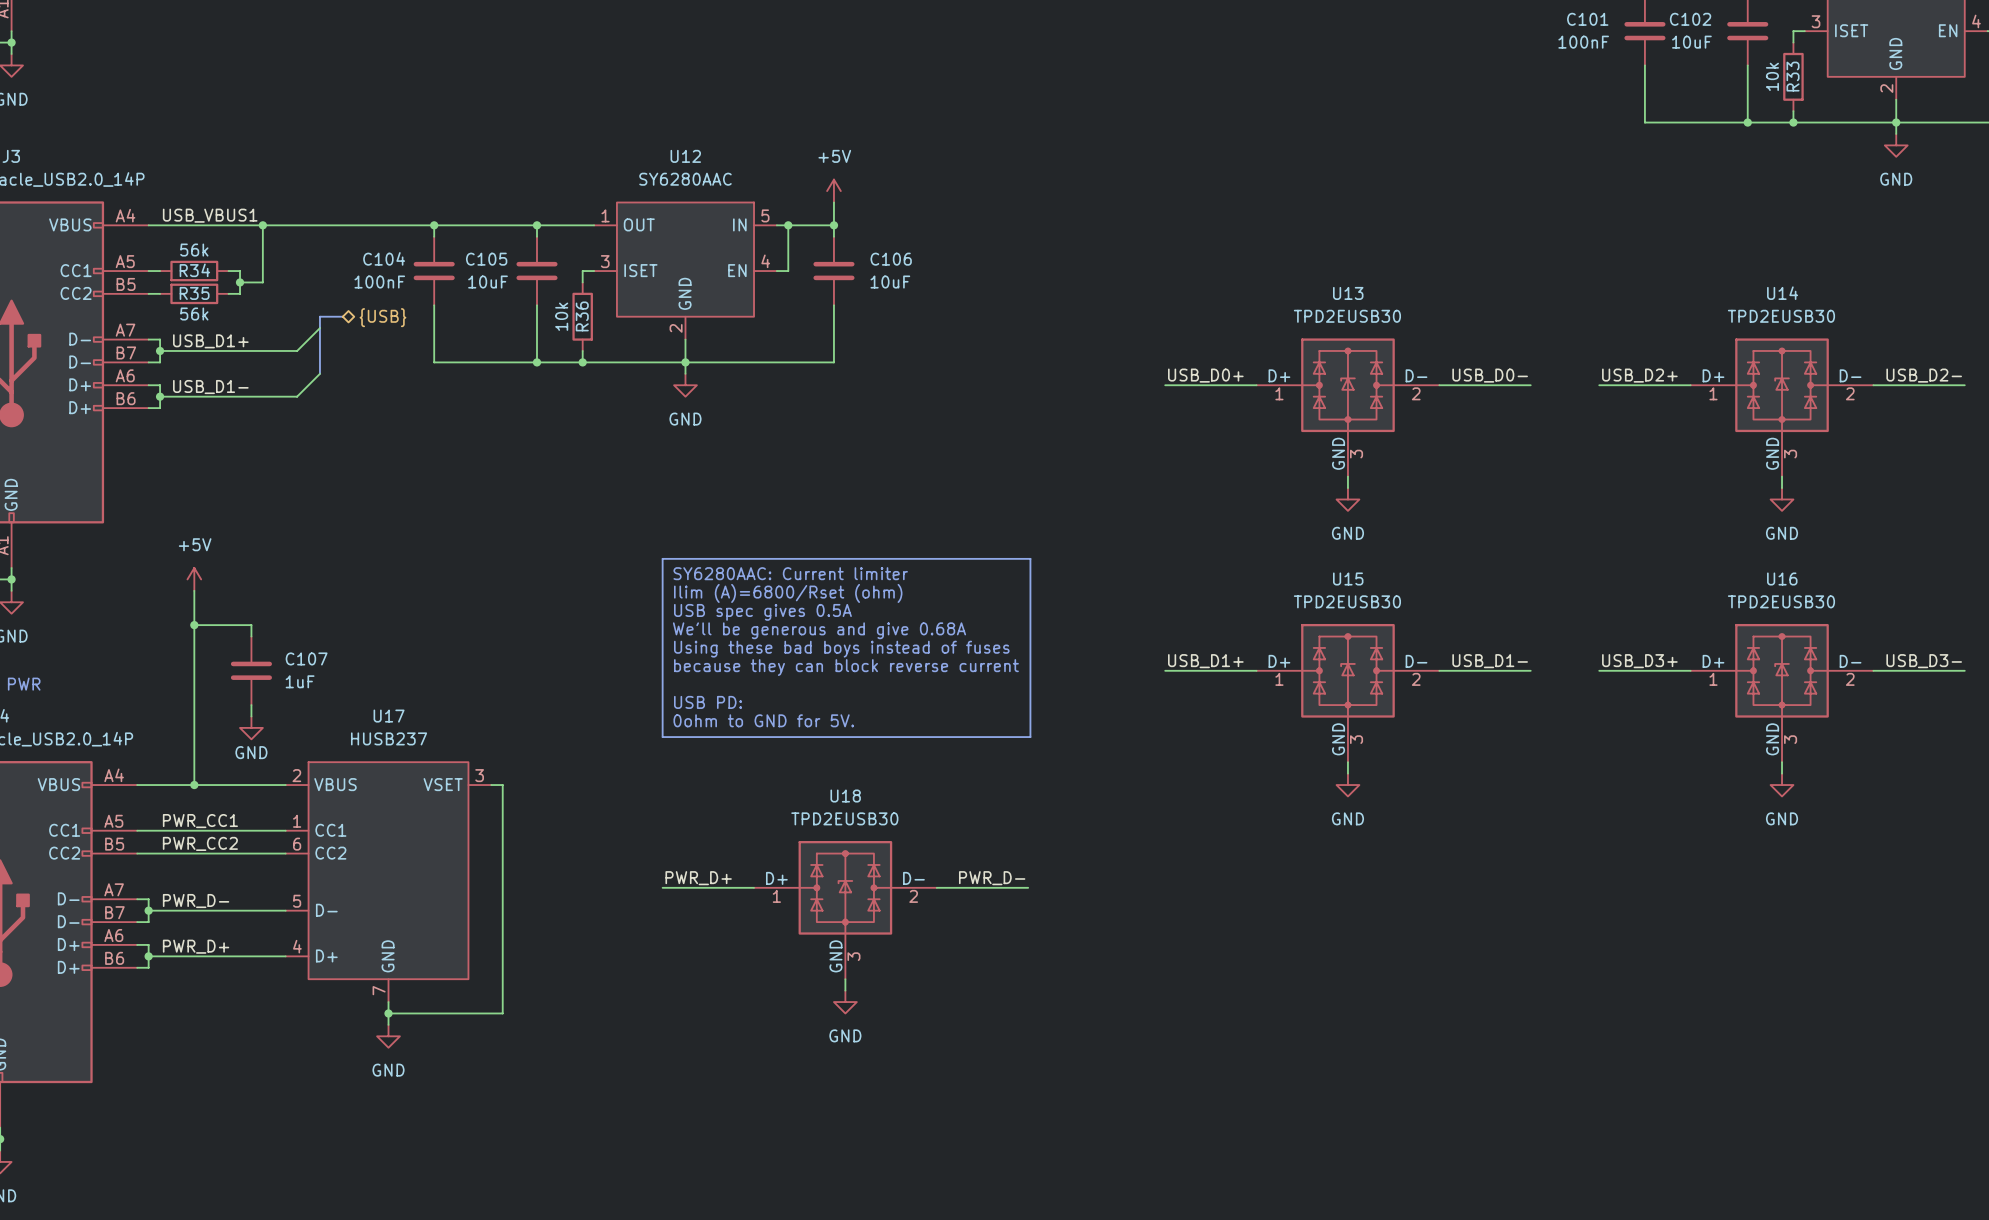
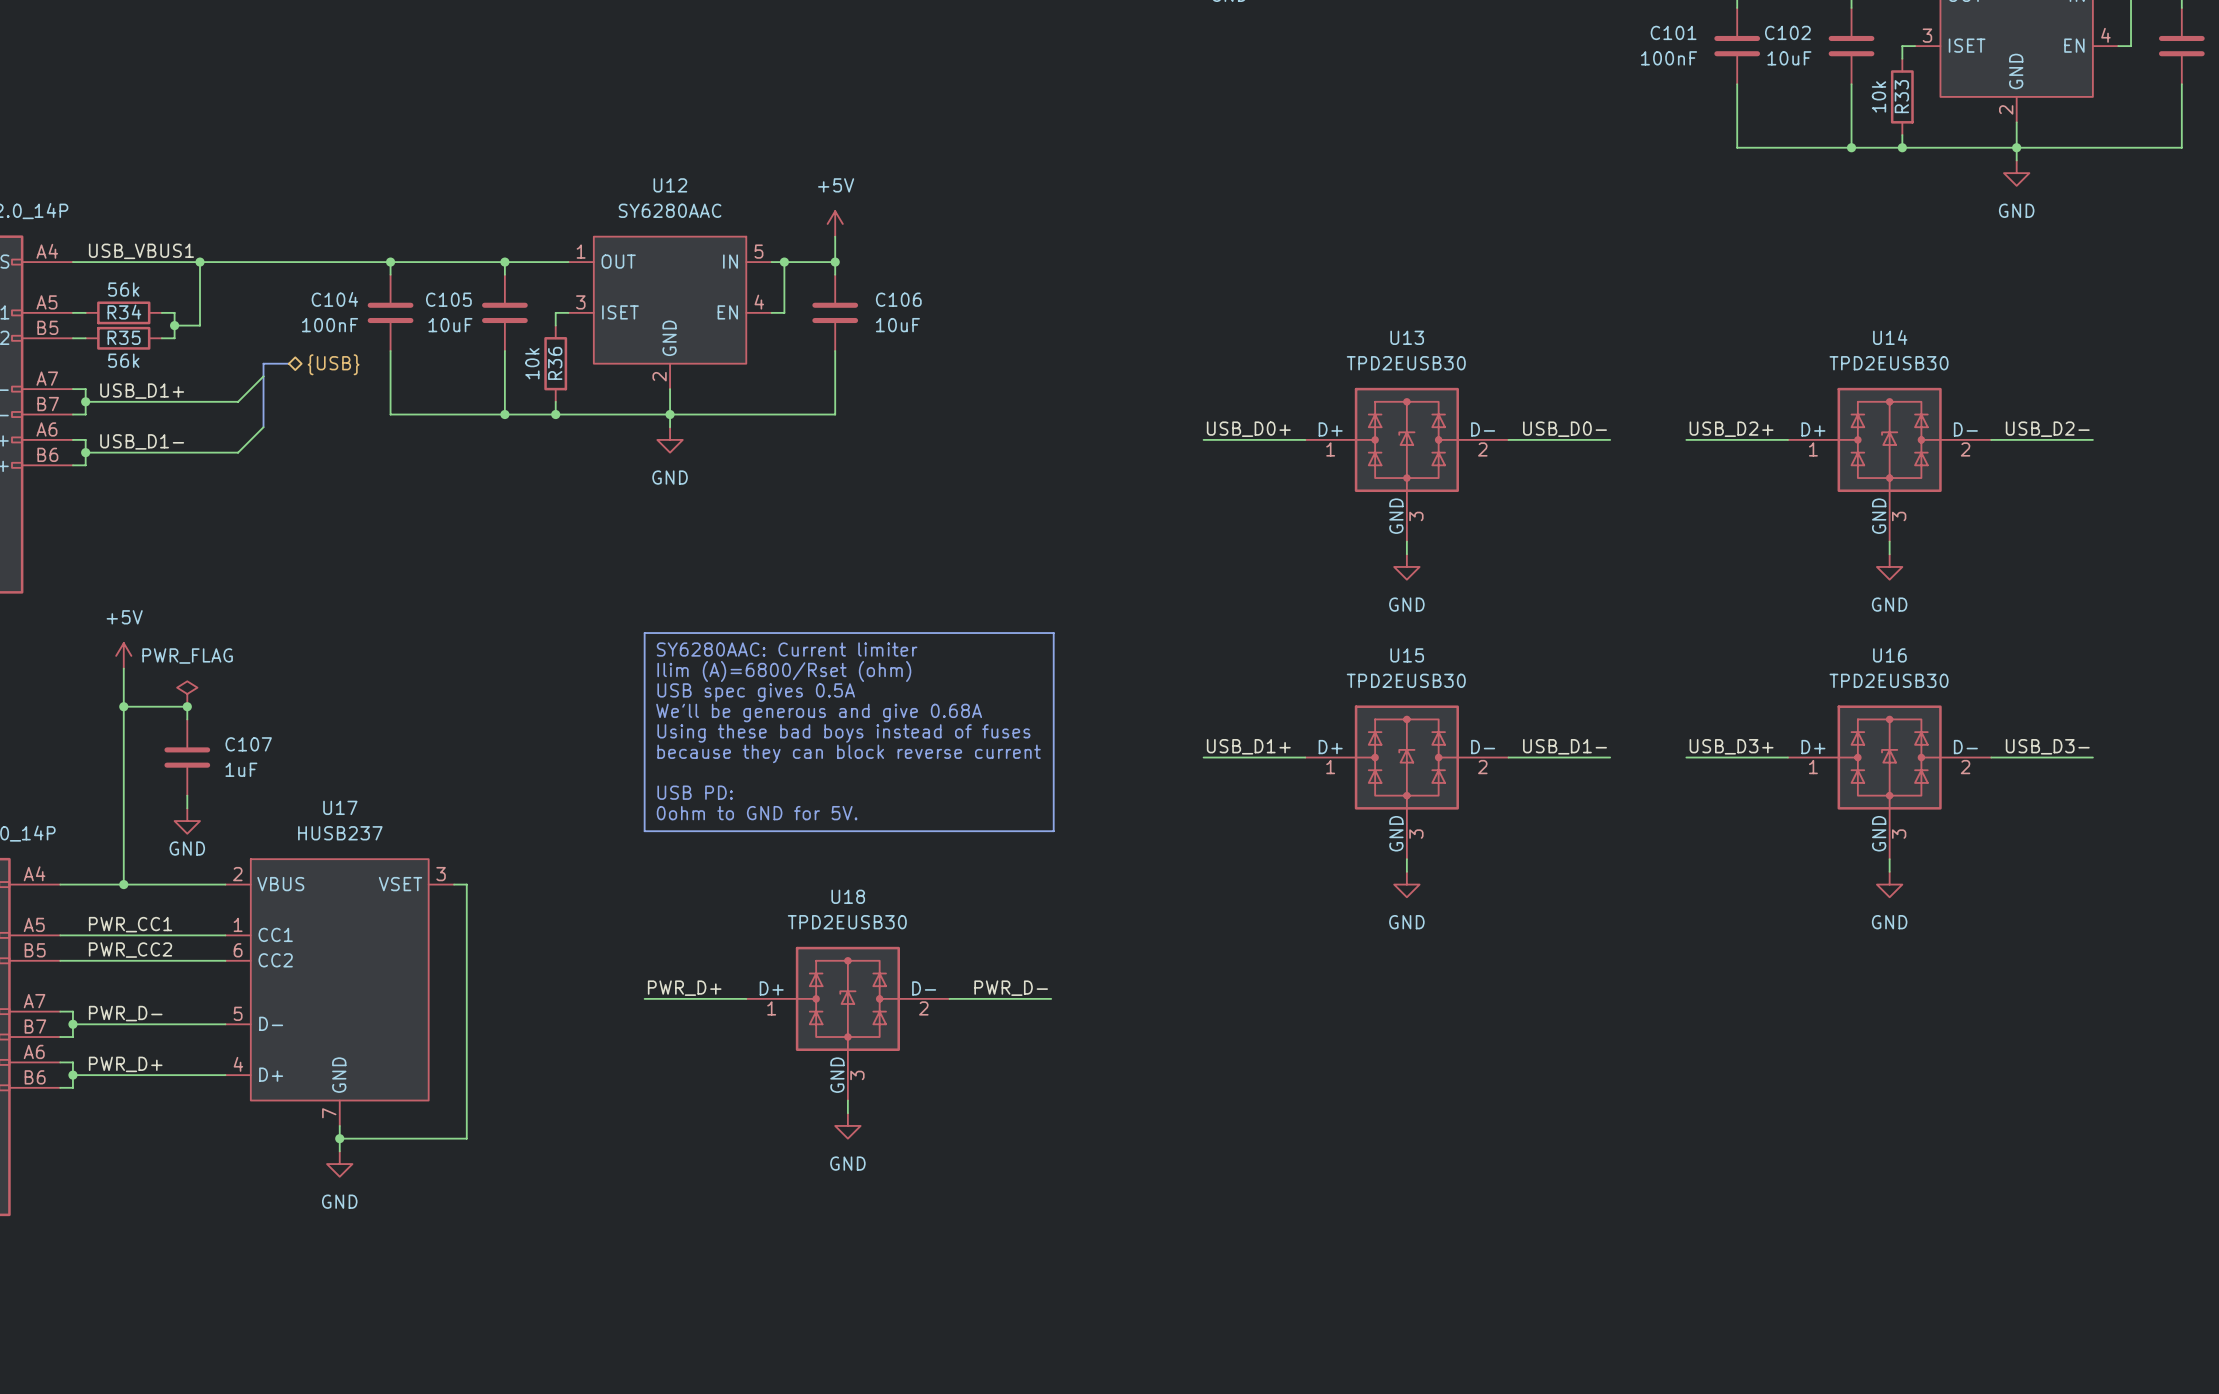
power symbol: none -> PWR_FLAG (187, 694)
junction: none -> (187, 706)

